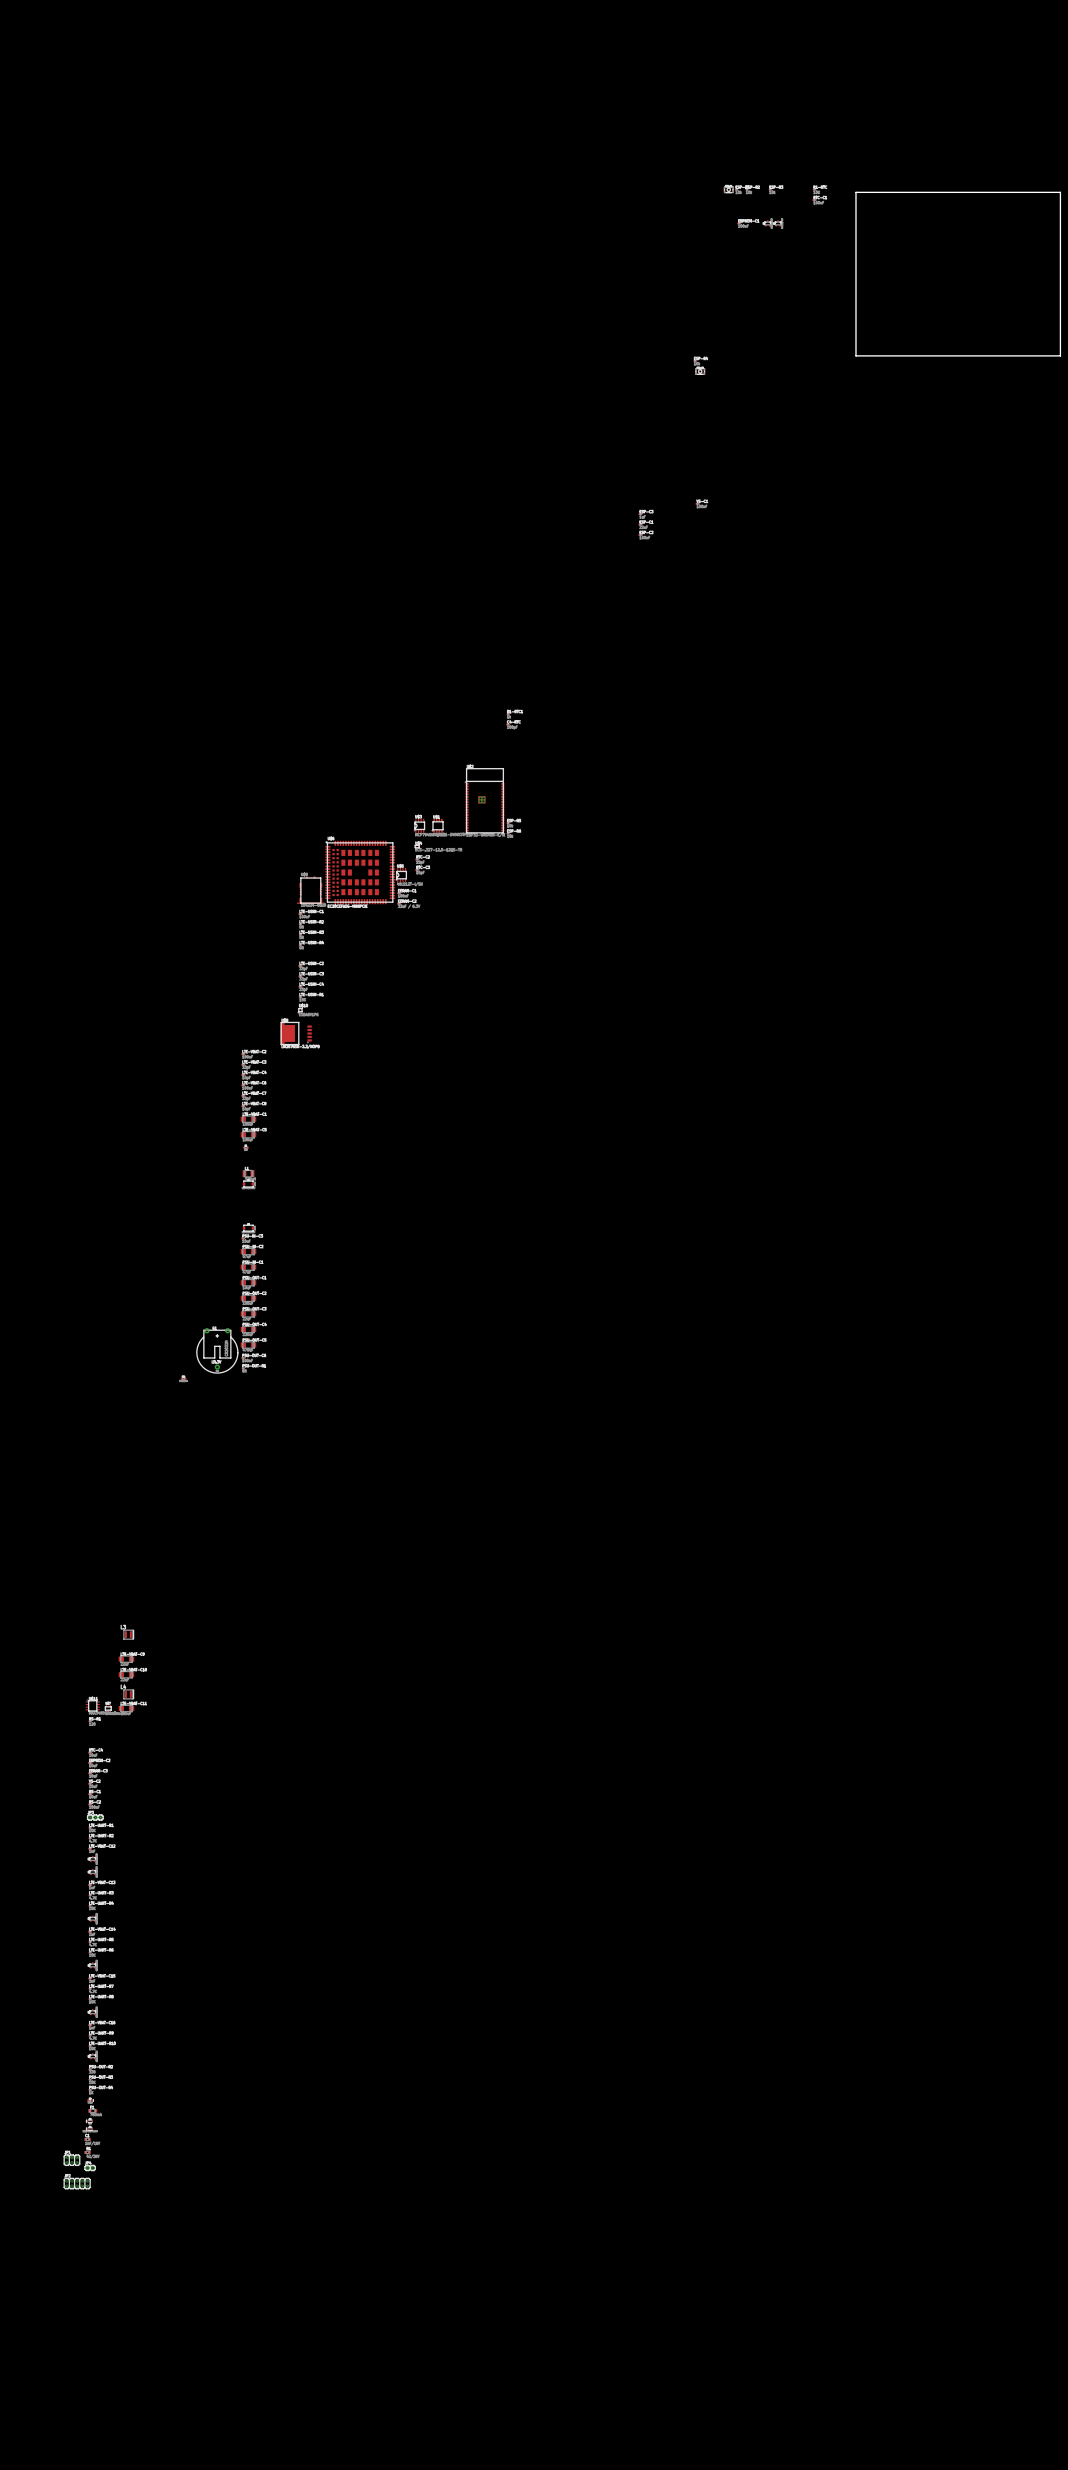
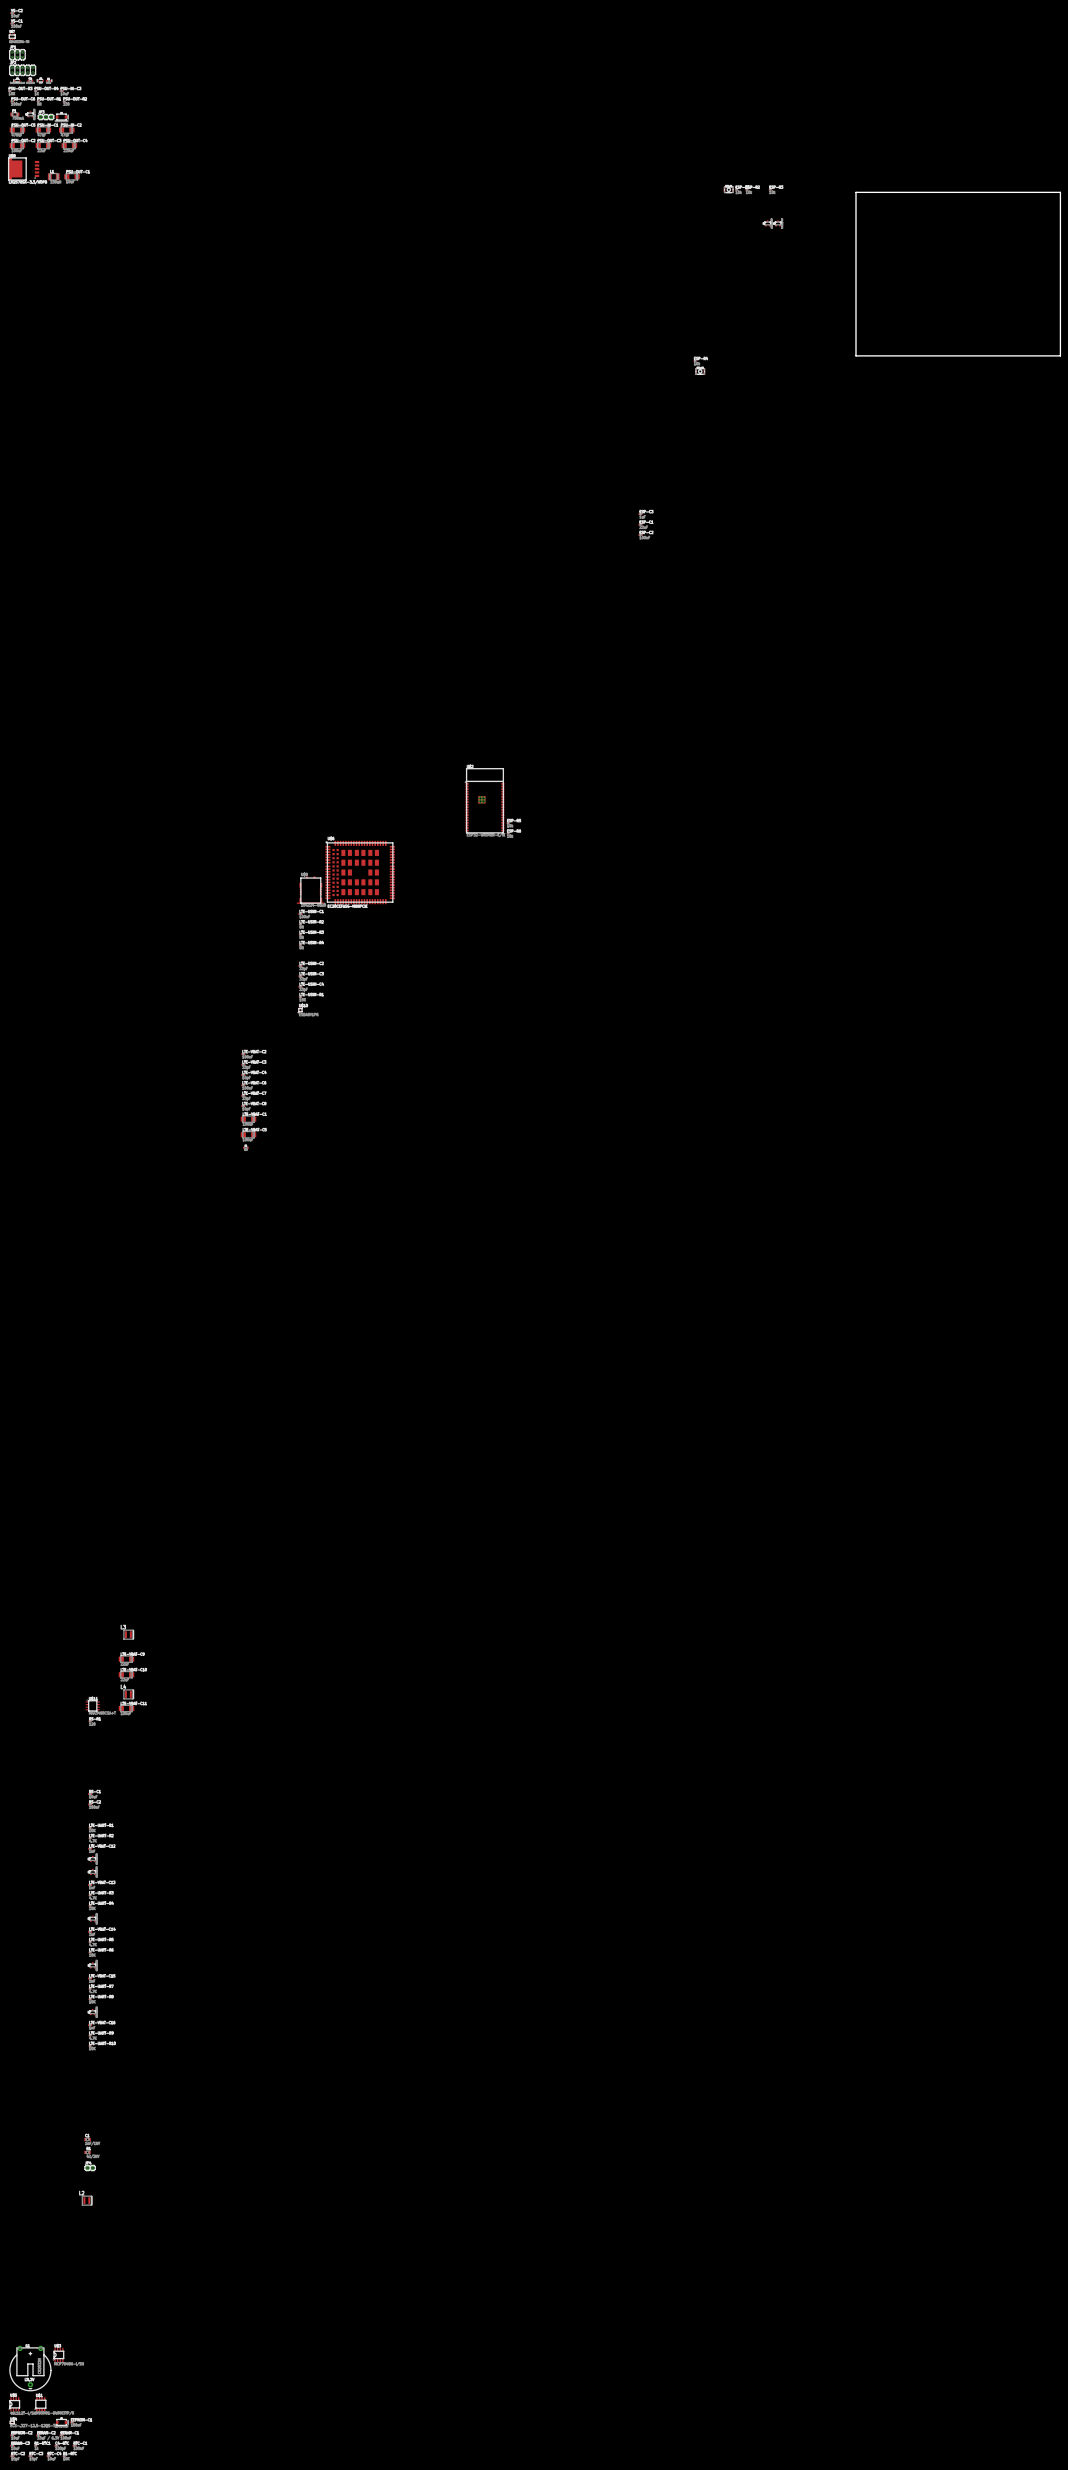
part position: (814, 189) -> (64, 2456)
part position: (814, 200) -> (74, 2445)
part position: (739, 223) -> (71, 2422)
part position: (697, 503) -> (12, 23)
part position: (508, 714) -> (35, 2445)
part position: (508, 724) -> (56, 2445)
part position: (419, 825) -> (58, 2354)
part position: (437, 825) -> (40, 2404)
part position: (417, 846) -> (12, 2422)
part position: (417, 859) -> (12, 2456)
part position: (417, 869) -> (30, 2456)
part position: (401, 875) -> (14, 2404)
part position: (399, 893) -> (61, 2435)
part position: (399, 903) -> (38, 2435)
part position: (296, 1033) -> (23, 168)
part position: (248, 1173) -> (53, 176)
part position: (249, 1184) -> (62, 2422)
part position: (249, 1228) -> (62, 117)
part position: (243, 1238) -> (61, 91)
part position: (248, 1251) -> (66, 130)
part position: (248, 1267) -> (43, 130)
part position: (248, 1282) -> (71, 176)
part position: (248, 1298) -> (17, 145)
part position: (248, 1313) -> (43, 145)
part position: (248, 1329) -> (69, 145)
part position: (248, 1345) -> (17, 130)
part position: (217, 1350) -> (30, 2368)
part position: (243, 1358) -> (12, 101)
part position: (243, 1368) -> (38, 101)
part position: (183, 1378) -> (30, 80)
part position: (108, 1708) -> (12, 36)
part position: (90, 1752) -> (48, 2456)
part position: (90, 1762) -> (12, 2435)
part position: (90, 1773) -> (12, 2445)
part position: (90, 1783) -> (12, 13)
part position: (95, 1817) -> (46, 117)
part position: (92, 2056) -> (30, 114)
part position: (90, 2069) -> (64, 101)
part position: (90, 2079) -> (9, 91)
part position: (90, 2090) -> (35, 91)
part position: (90, 2100) -> (48, 80)
part position: (92, 2110) -> (14, 114)
part position: (89, 2121) -> (40, 80)
part position: (89, 2129) -> (17, 80)
part position: (71, 2160) -> (17, 54)
part position: (77, 2183) -> (22, 70)
part: none -> (87, 2200)

